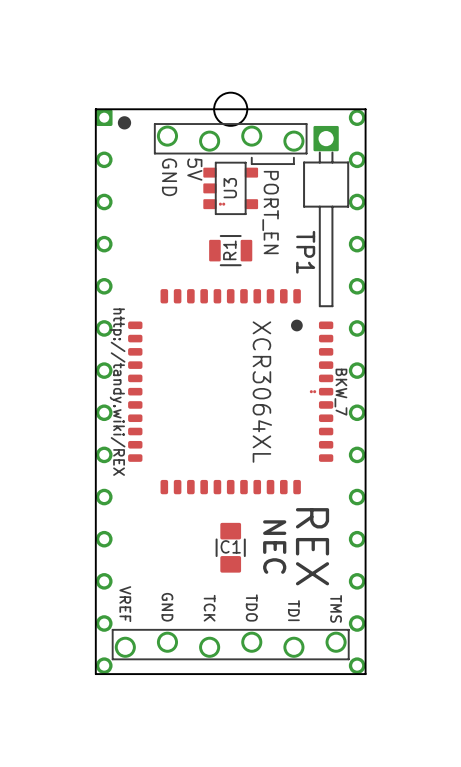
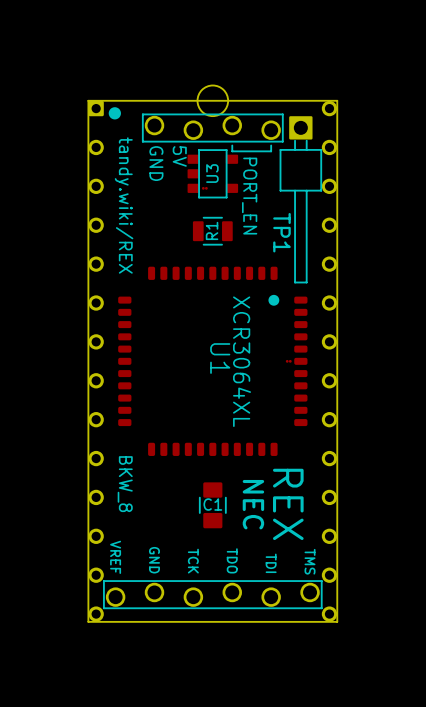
U1 name: none -> U1 (220, 358)
text: http://tandy.wiki/REX (117, 392) -> tandy.wiki/REX (124, 205)
text: BKW_7 (340, 392) -> none
text: none -> BKW_8 (125, 484)

